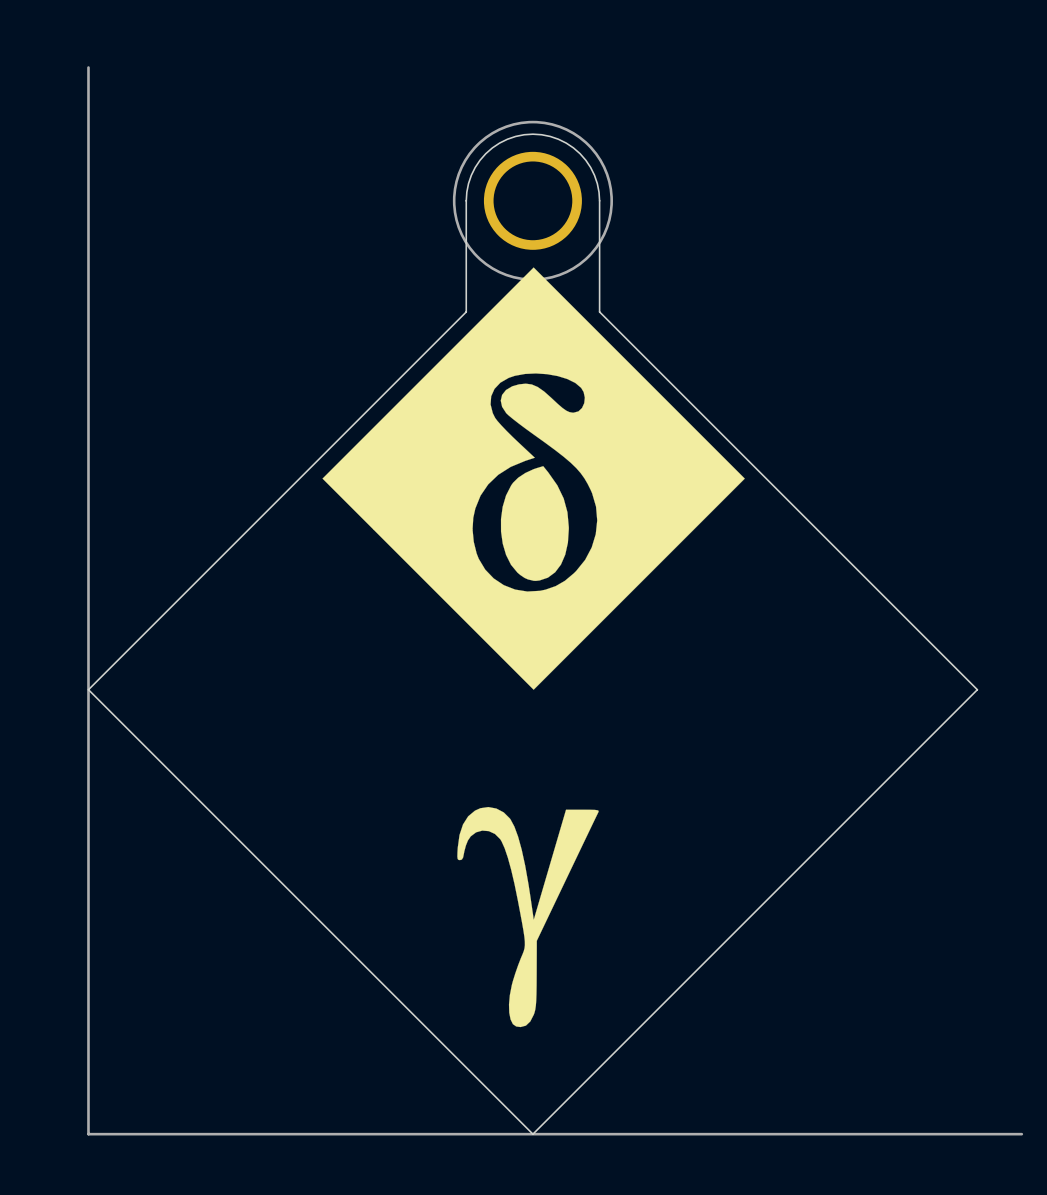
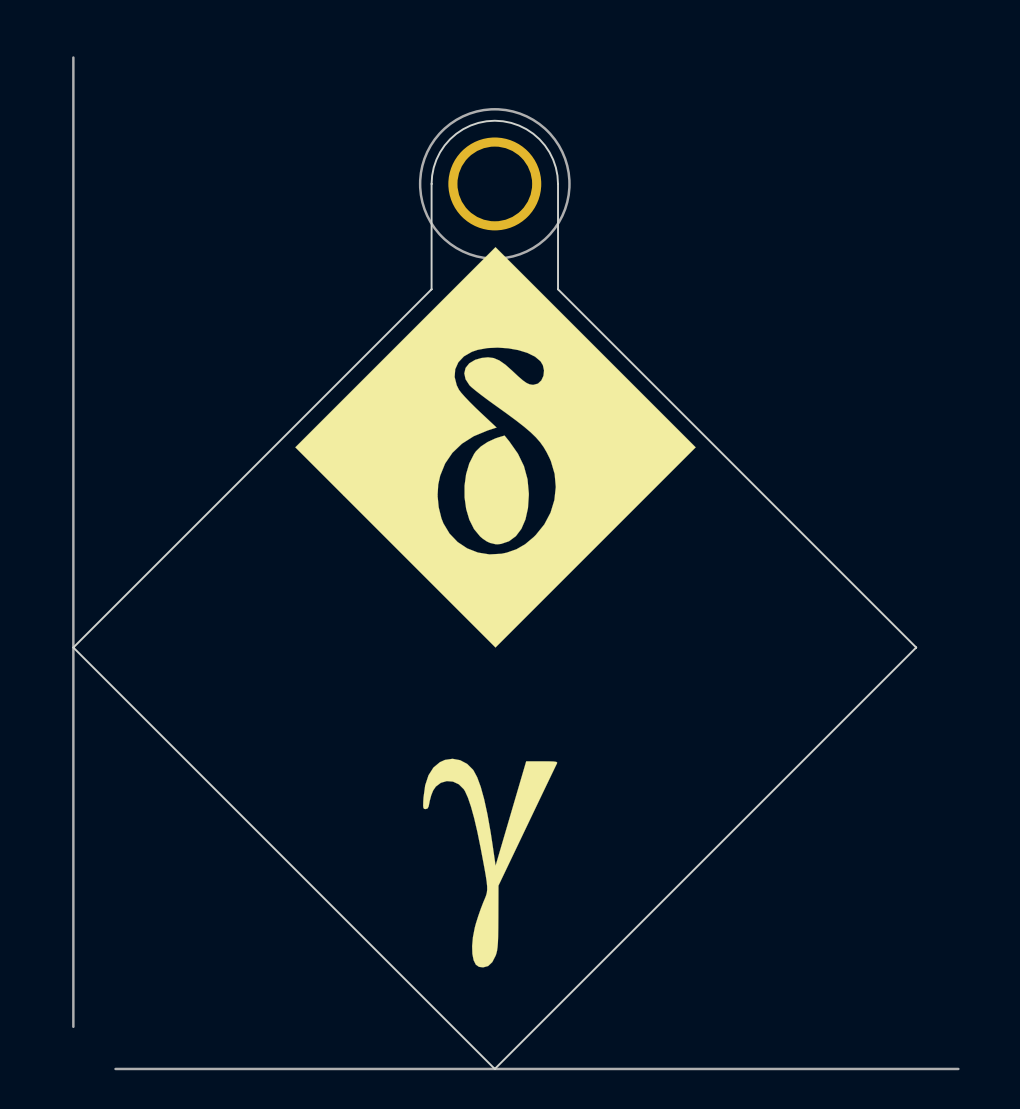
line: (88, 1089) (88, 1134) (132, 1134) -> none

